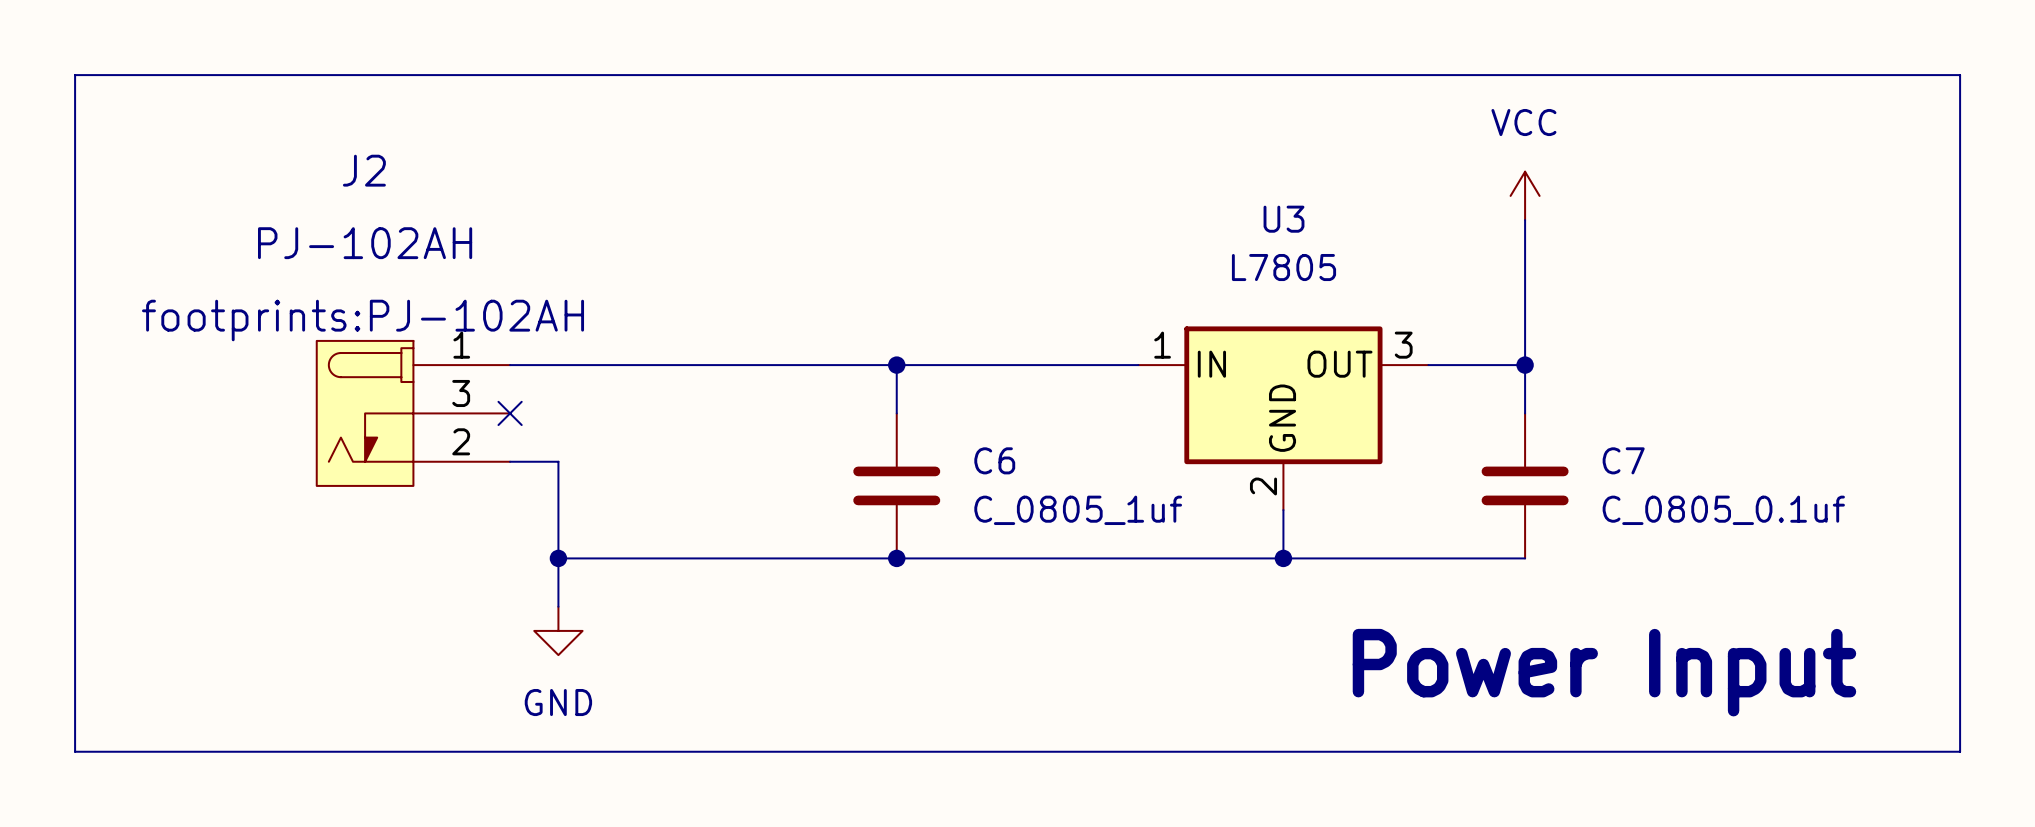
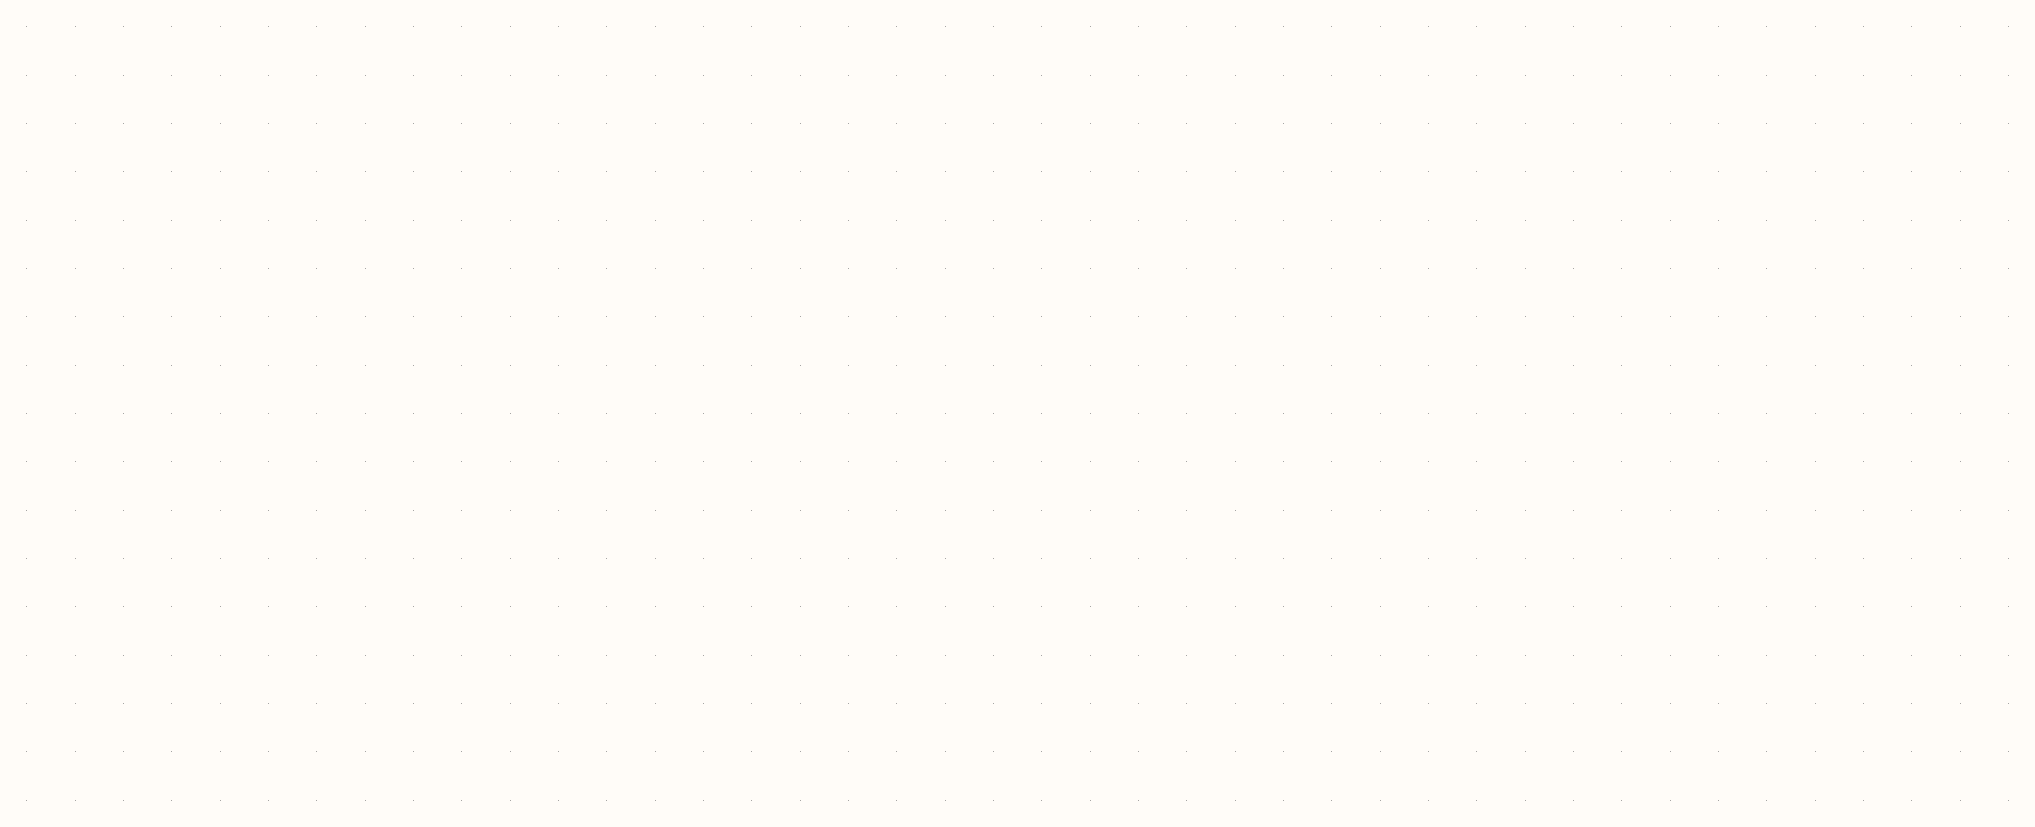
line: (75, 75) (75, 751) (1960, 751) (1960, 75) (75, 75) -> none
power symbol: VCC (1525, 195) -> none
wire: (1525, 220) (1525, 413) -> none
wire: (510, 365) (1138, 365) -> none
wire: (896, 365) (896, 413) -> none
junction: (896, 365) -> none
wire: (1428, 365) (1525, 365) -> none
junction: (1525, 365) -> none
J2: PJ-102AH (413, 413) -> none
no-connect mark: (510, 413) -> none
U3: L7805 (1283, 418) -> none
wire: (510, 461) (558, 461) (558, 606) -> none
C6: C_0805_1uf (896, 485) -> none
C7: C_0805_0.1uf (1525, 485) -> none
wire: (1283, 510) (1283, 558) -> none
wire: (558, 558) (1525, 558) -> none
junction: (558, 558) -> none
junction: (896, 558) -> none
junction: (1283, 558) -> none
power symbol: GND (558, 630) -> none
text: Power Input (1604, 672) -> none

